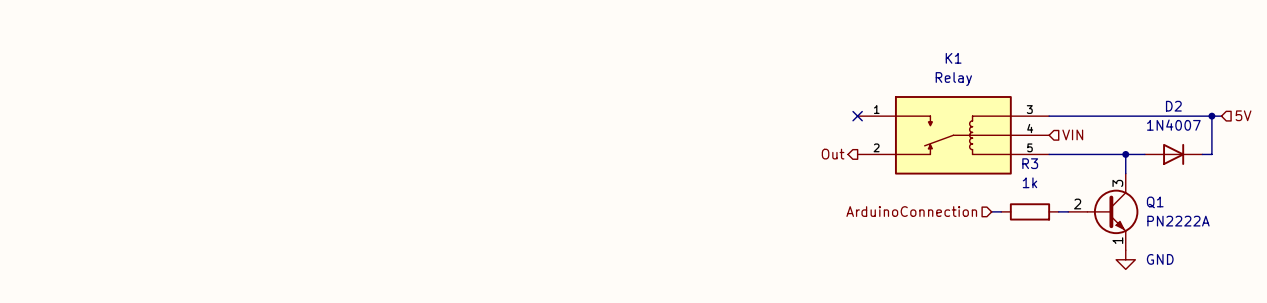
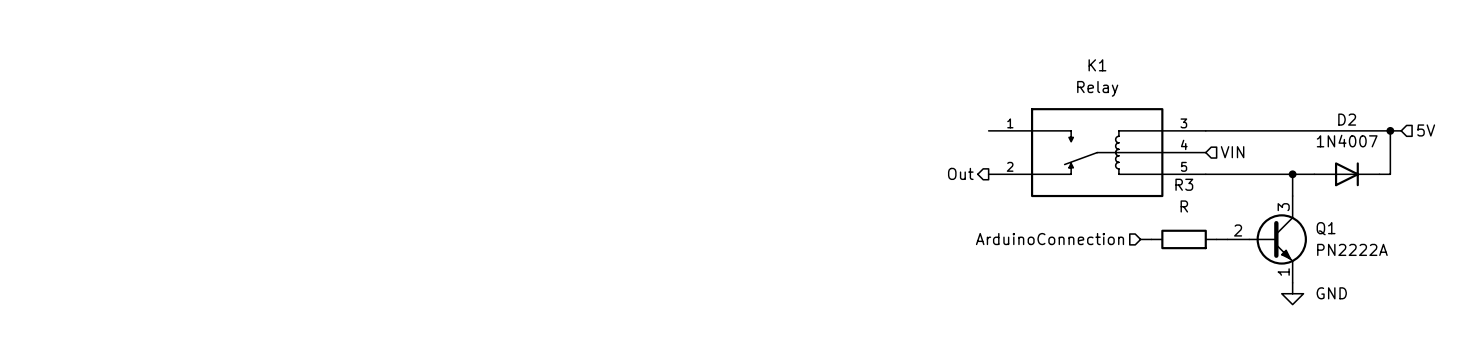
no-connect mark: (857, 116) -> none
R3 value: 1k (1029, 182) -> R (1184, 206)

